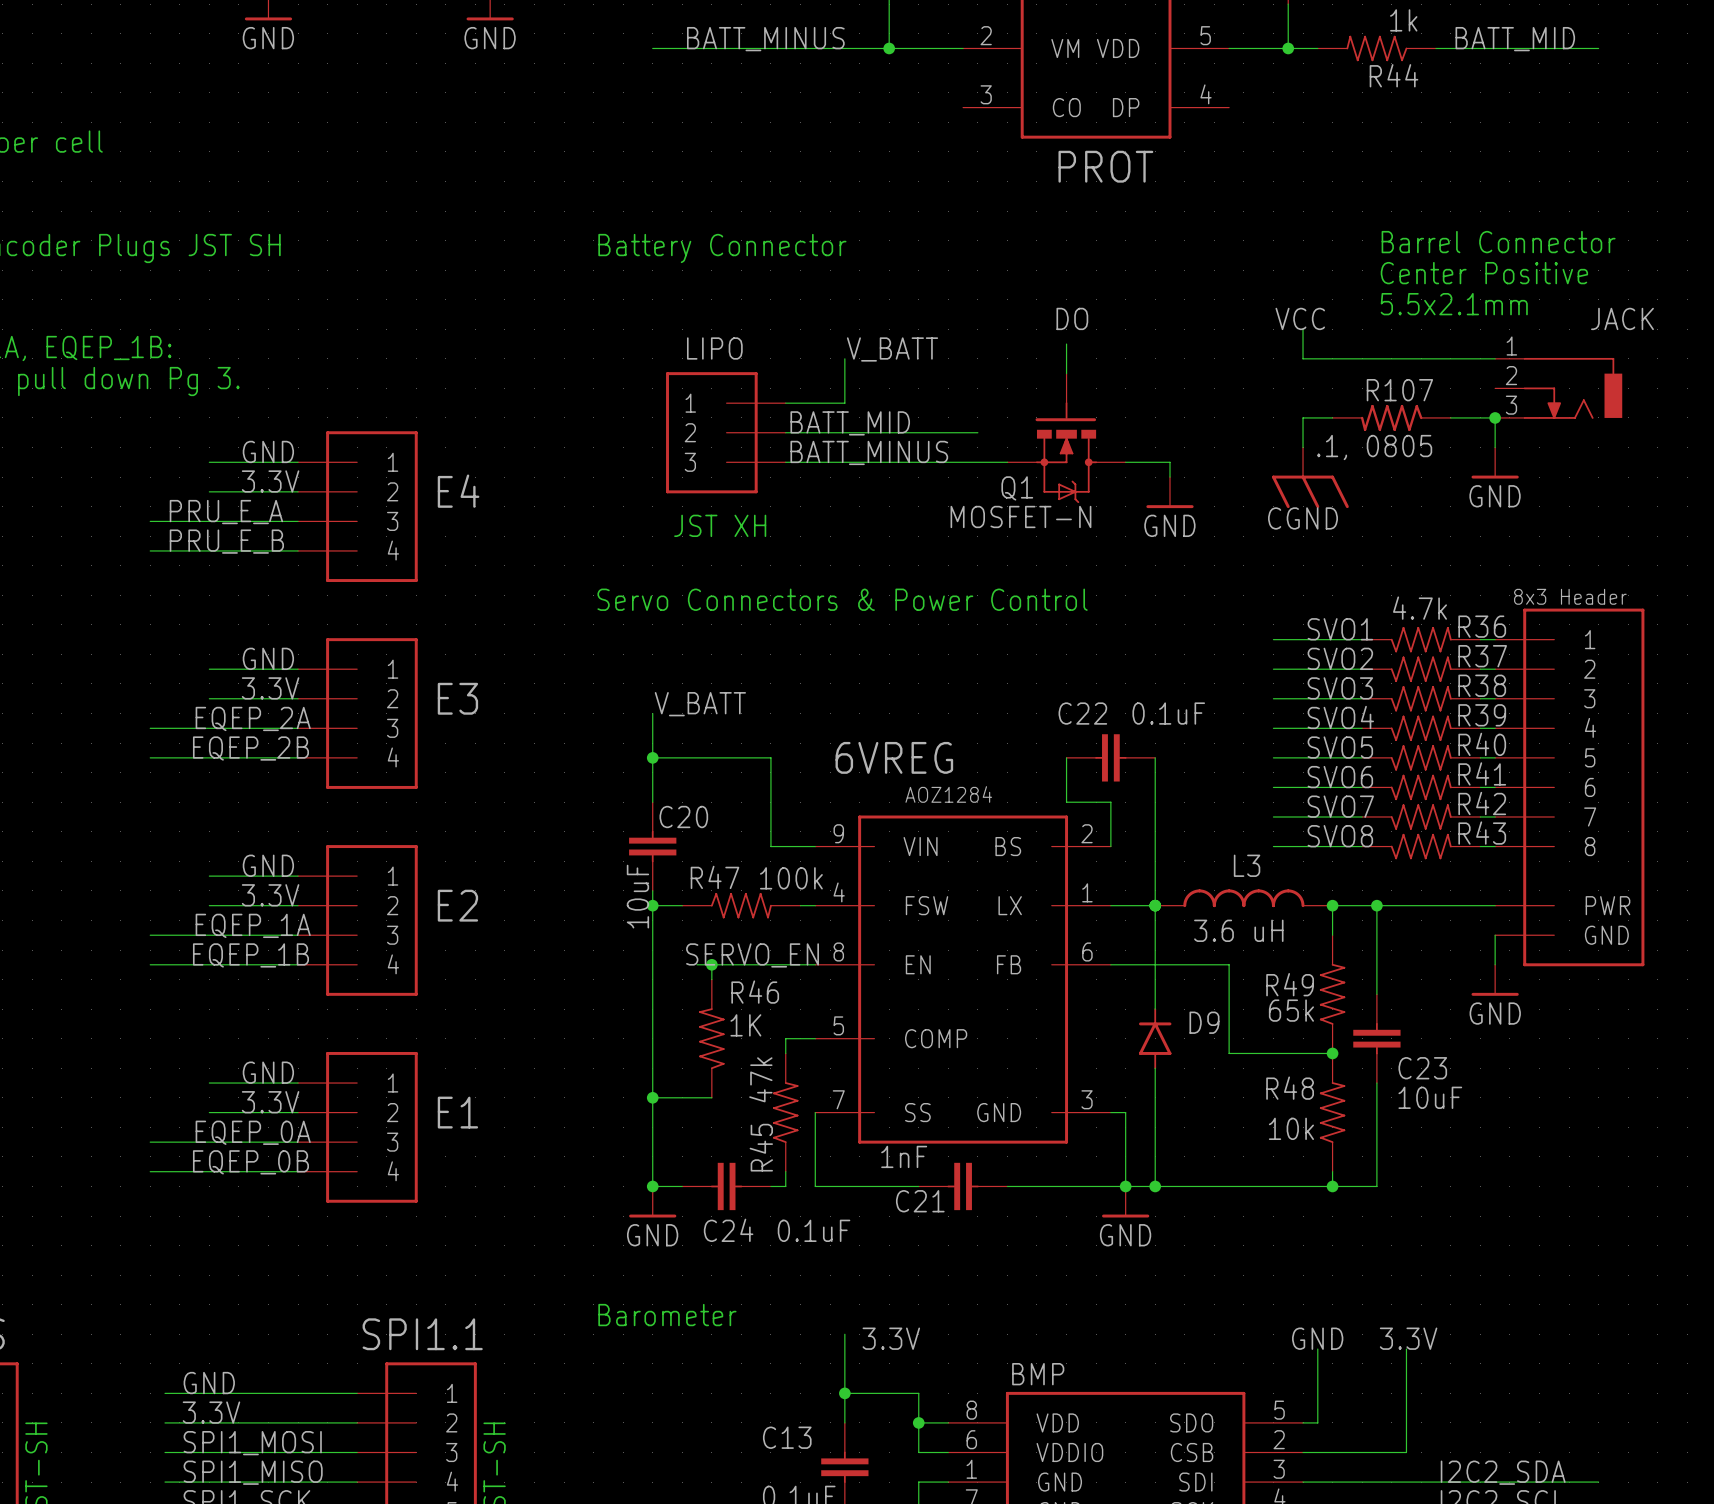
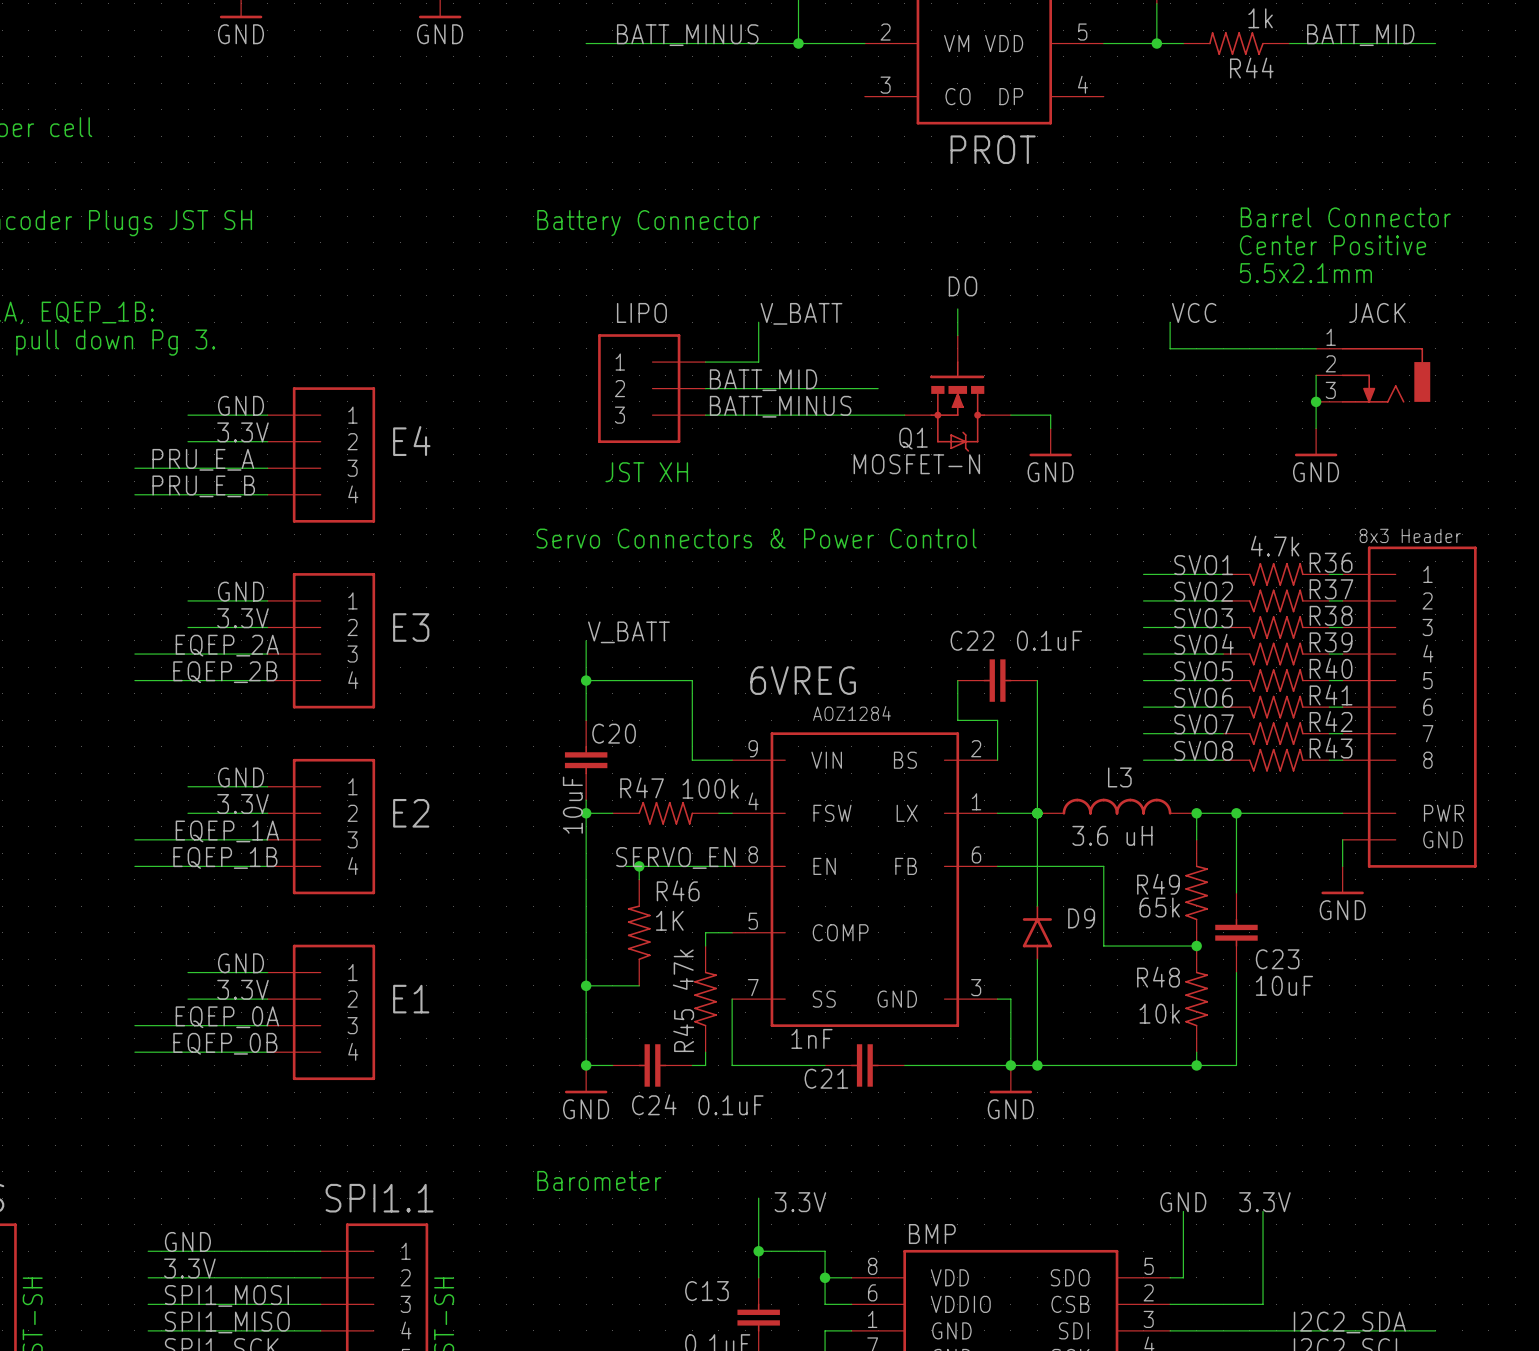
label position: VCC (1300, 318) -> VCC (1194, 312)
JACK name position: JACK (1622, 318) -> JACK (1377, 312)
wire: (1303, 329) (1303, 358) (1495, 358) -> none
wire: none -> (1170, 322) (1170, 348) (1316, 348)
JACK position: (1558, 388) -> (1373, 375)
wire: (1332, 417) (1303, 417) (1303, 447) -> none
R107: .1, 0805 (1391, 417) -> none
wire: (1450, 417) (1495, 417) (1495, 447) -> none
wire: none -> (1316, 375) (1316, 428)
junction position: (1495, 417) -> (1316, 401)
power symbol position: GND (1495, 463) -> GND (1316, 442)
power symbol: CGND (1310, 477) -> none

